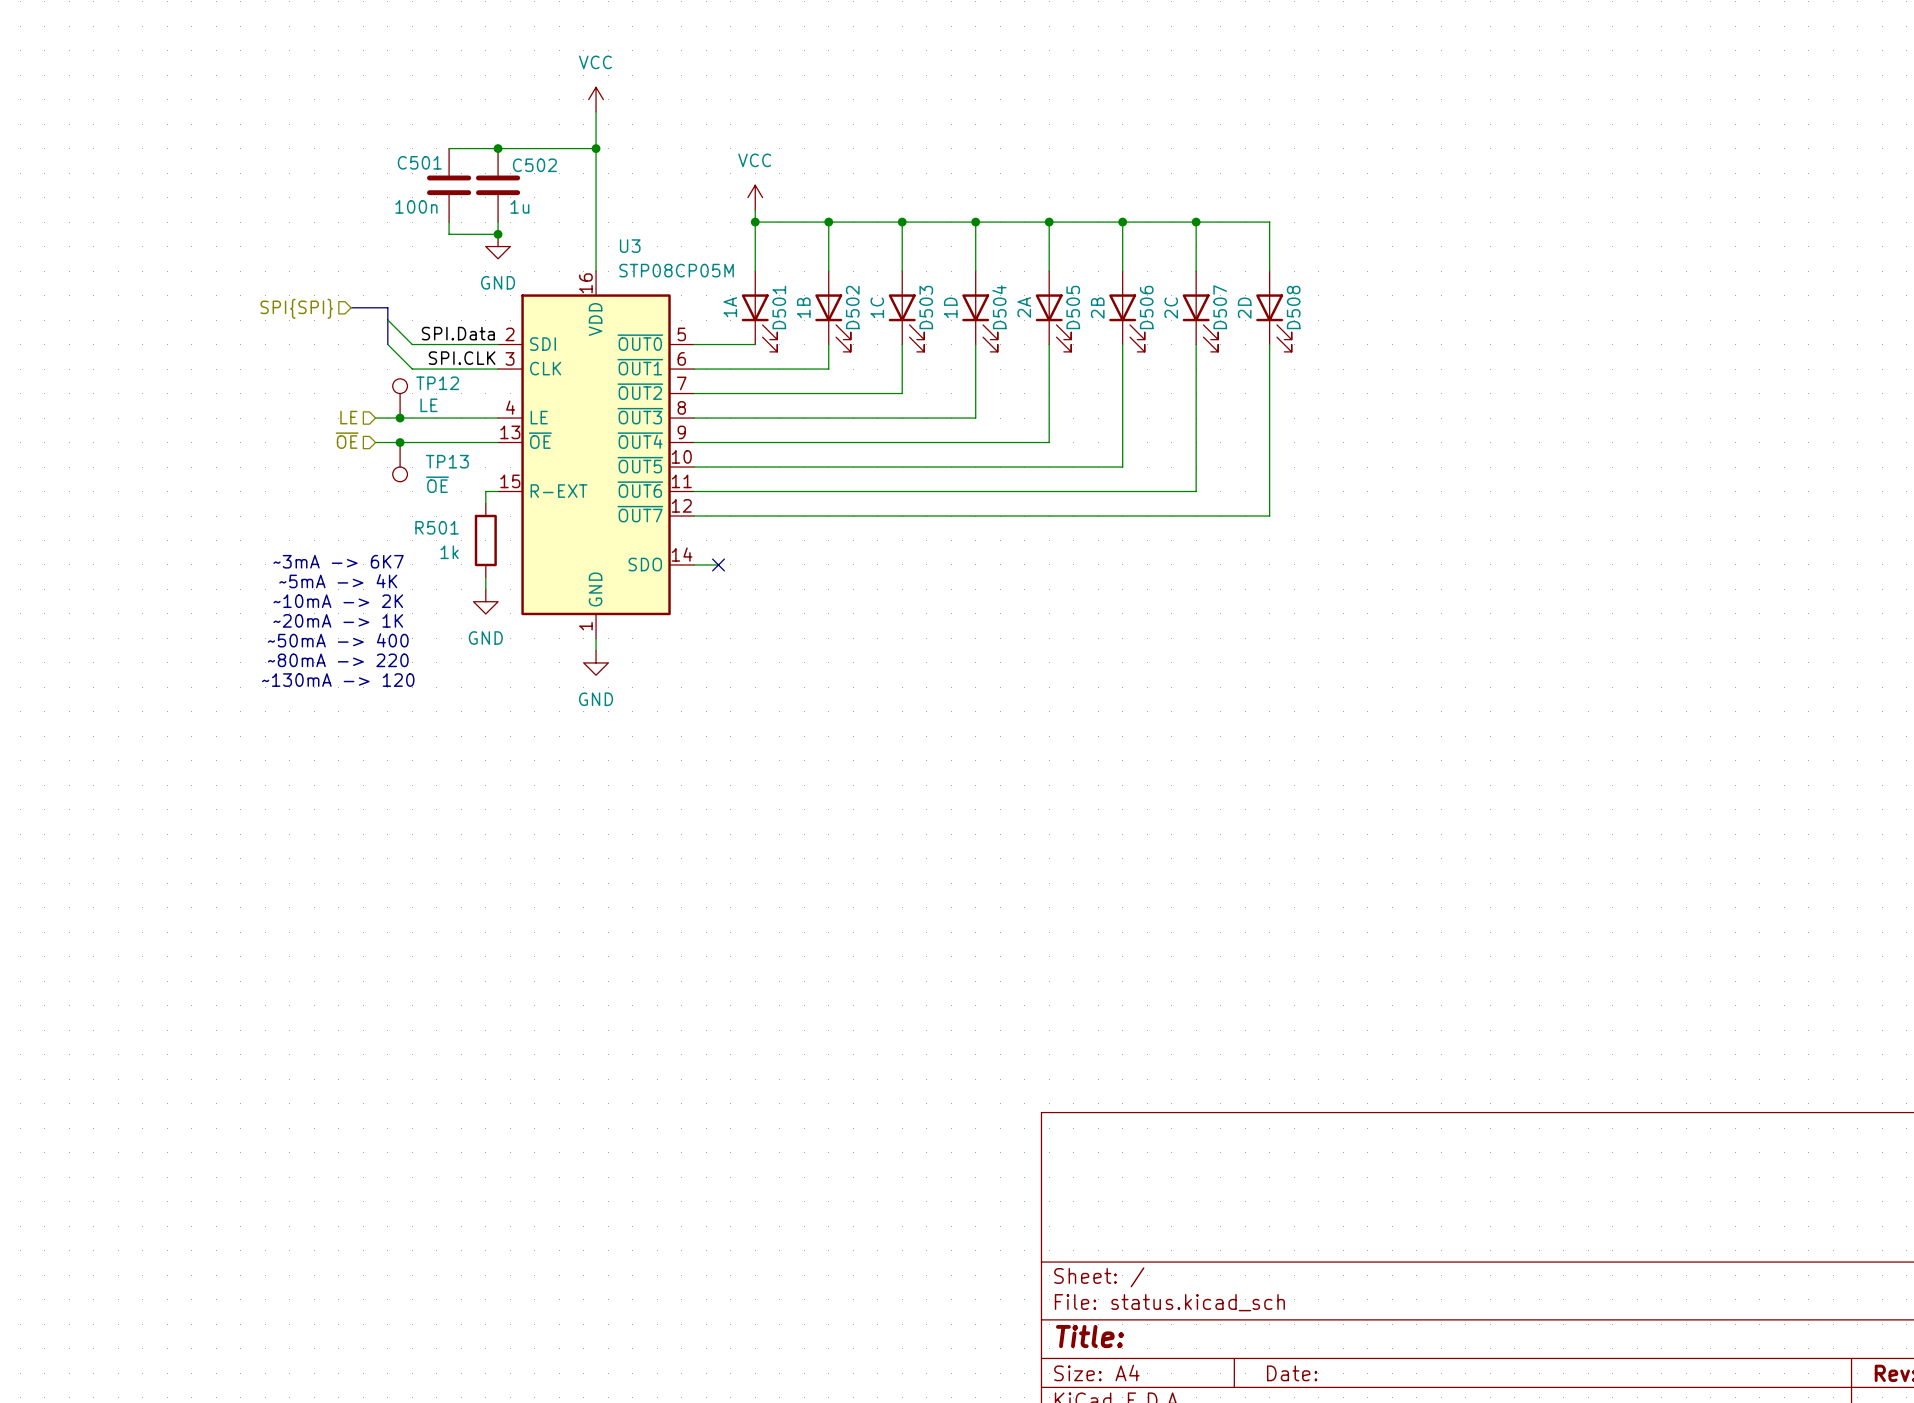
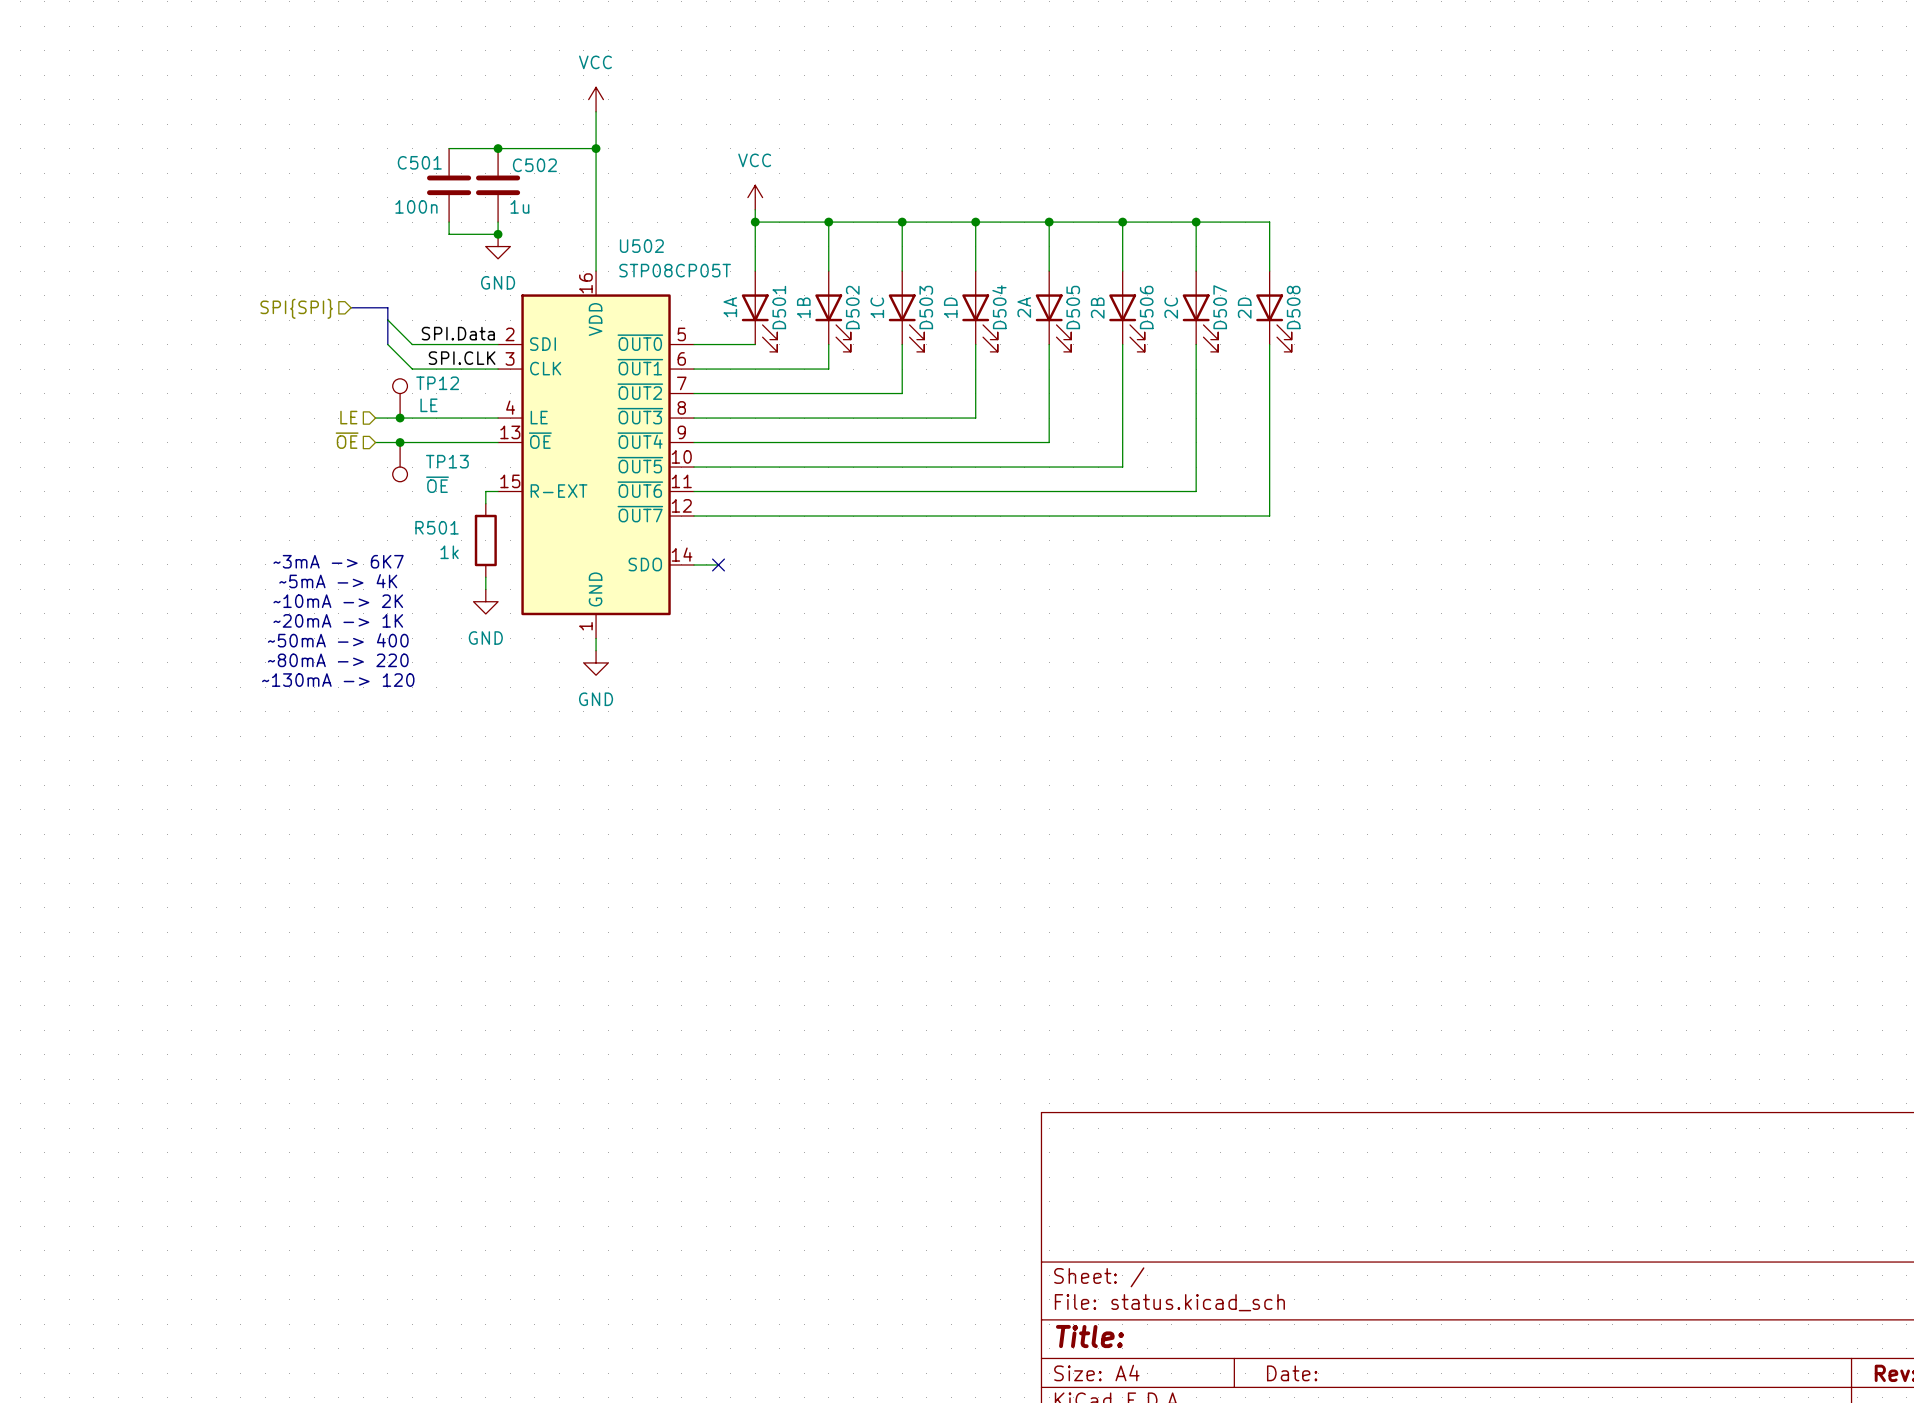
U3 name: U3 (630, 246) -> U502 (641, 246)
U3 value: STP08CP05M (676, 270) -> STP08CP05T (675, 270)

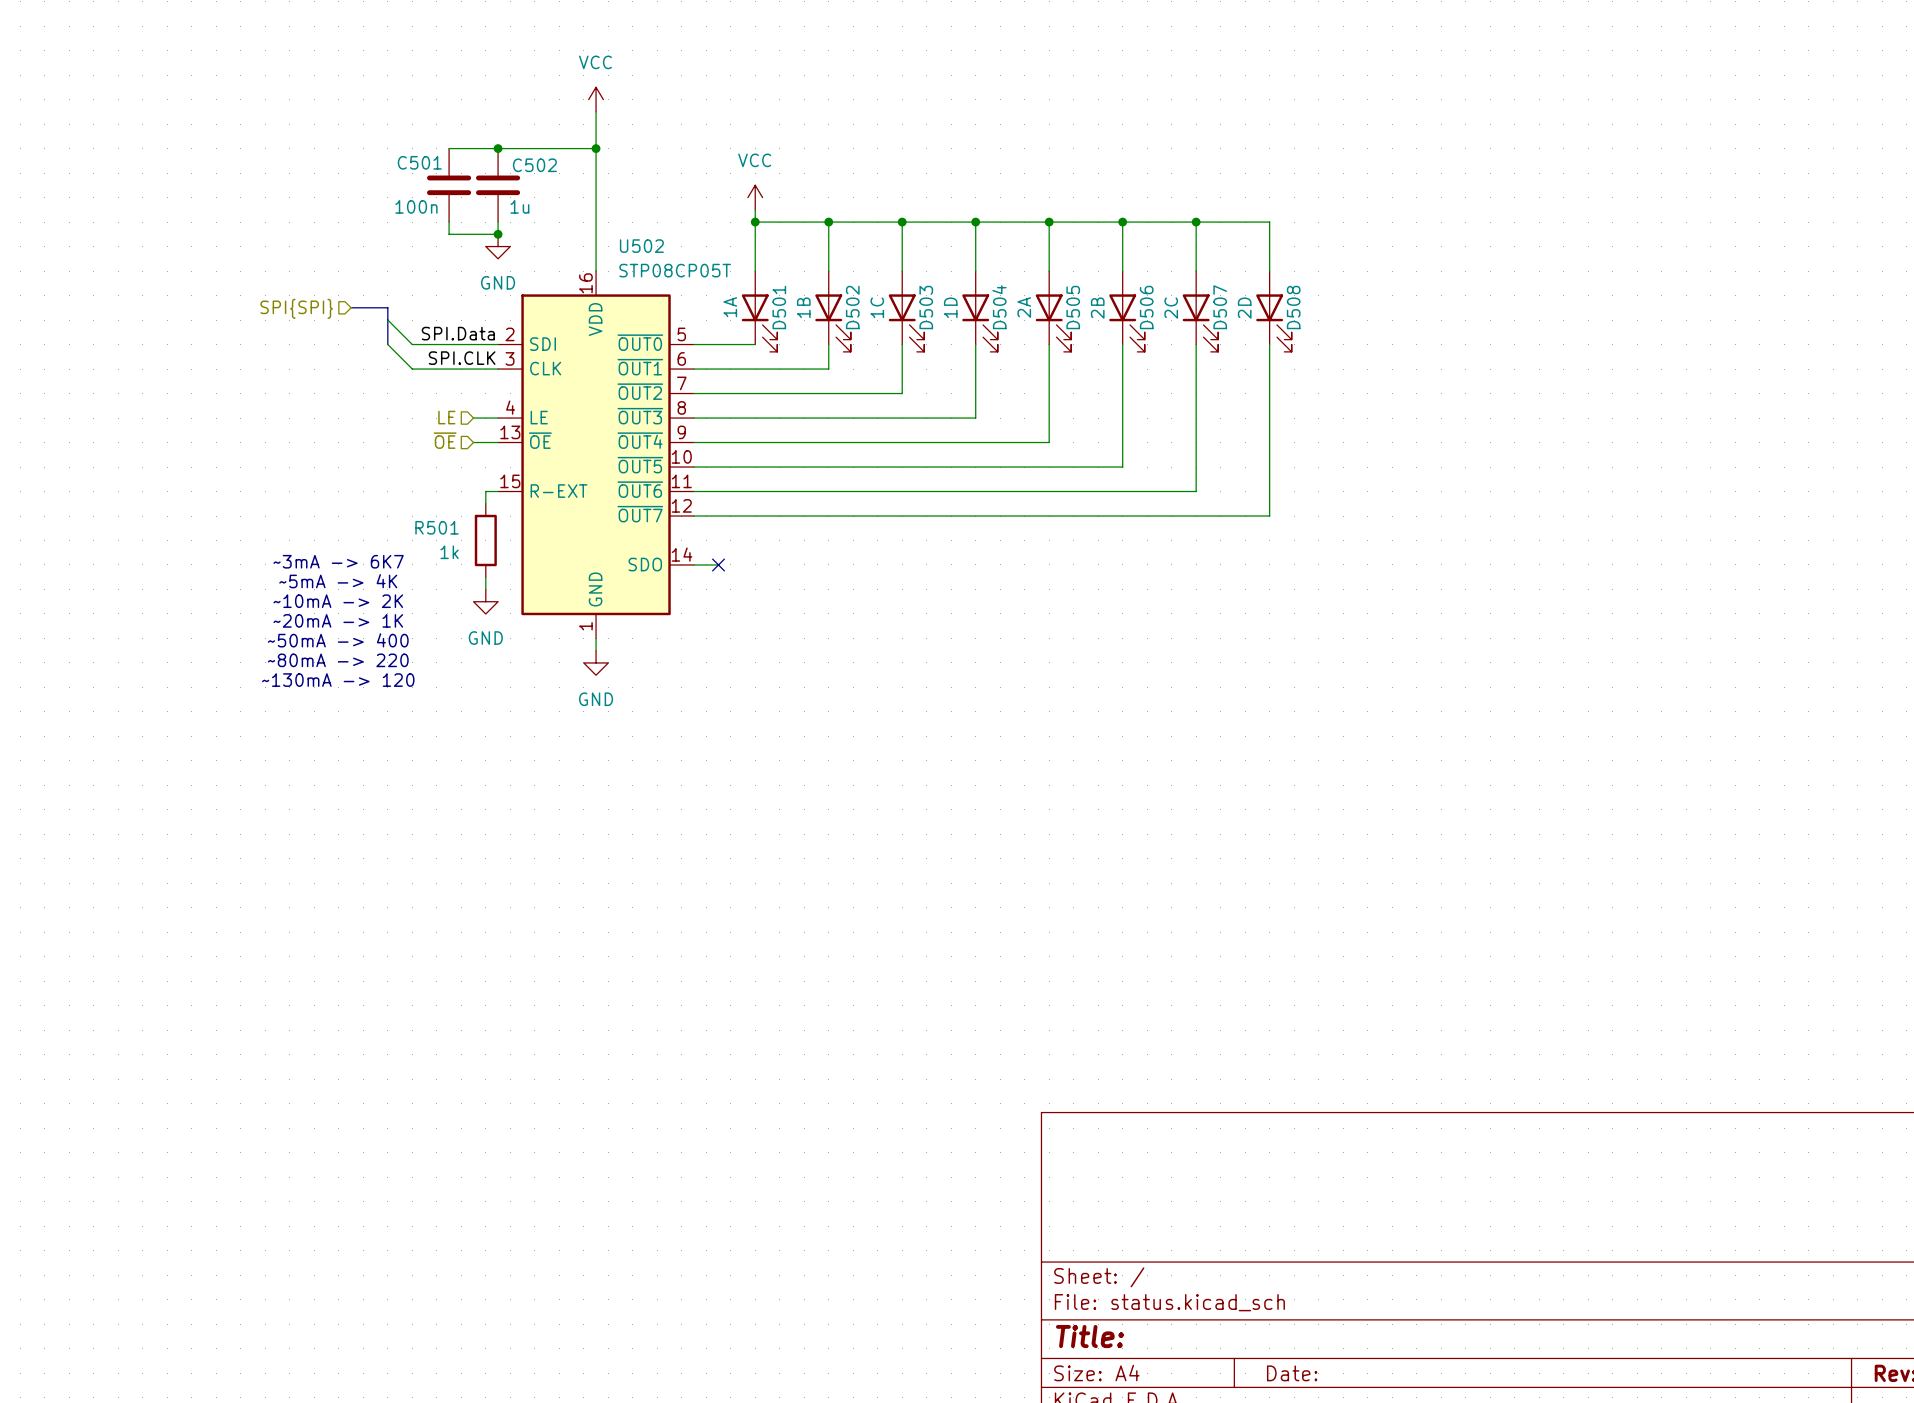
TP12: LE (400, 398) -> none
hierarchical label position: LE (348, 417) -> LE (446, 417)
wire: (375, 418) (473, 418) -> none
junction: (400, 418) -> none
hierarchical label position: ~{OE} (347, 440) -> ~{OE} (445, 440)
wire: (375, 442) (473, 442) -> none
junction: (400, 442) -> none
TP13: ~{OE} (400, 462) -> none

